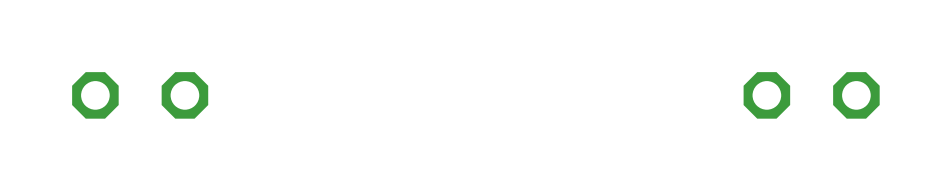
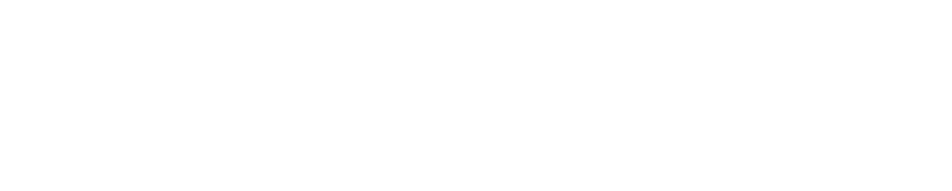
part: (140, 95) -> none
part: (811, 95) -> none

